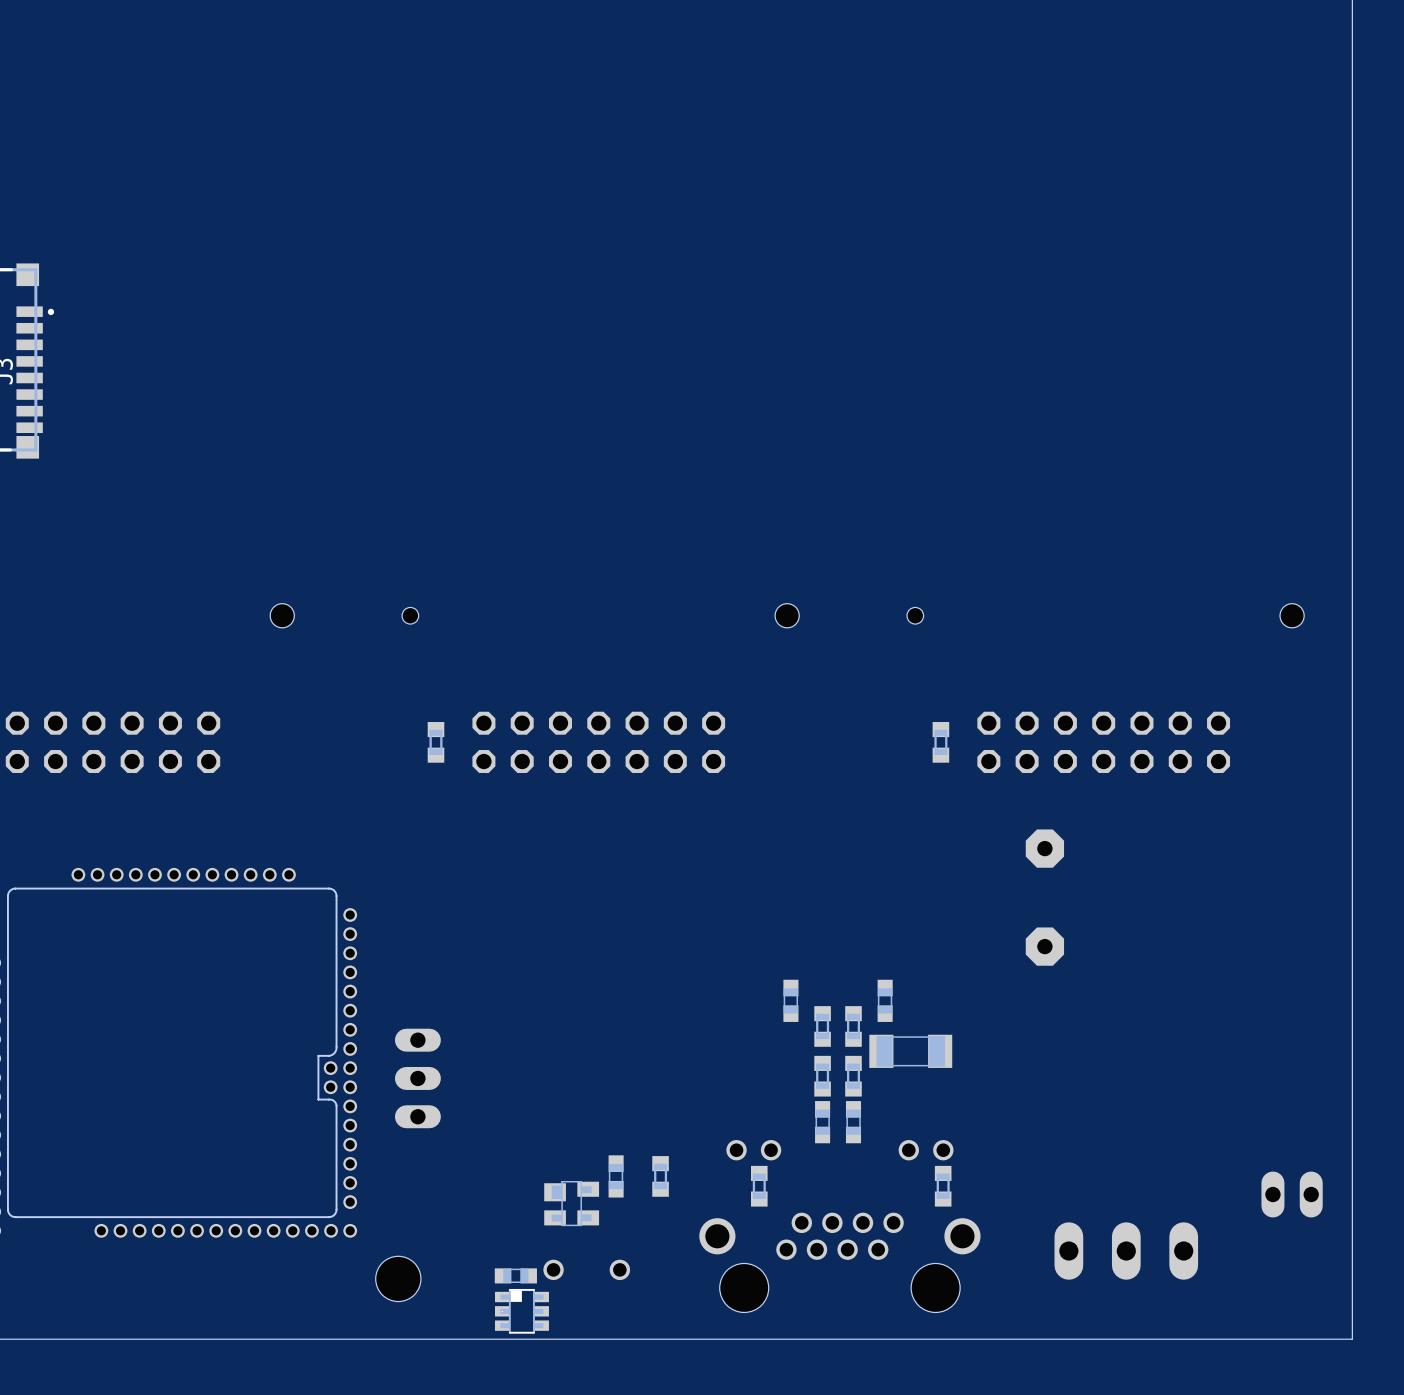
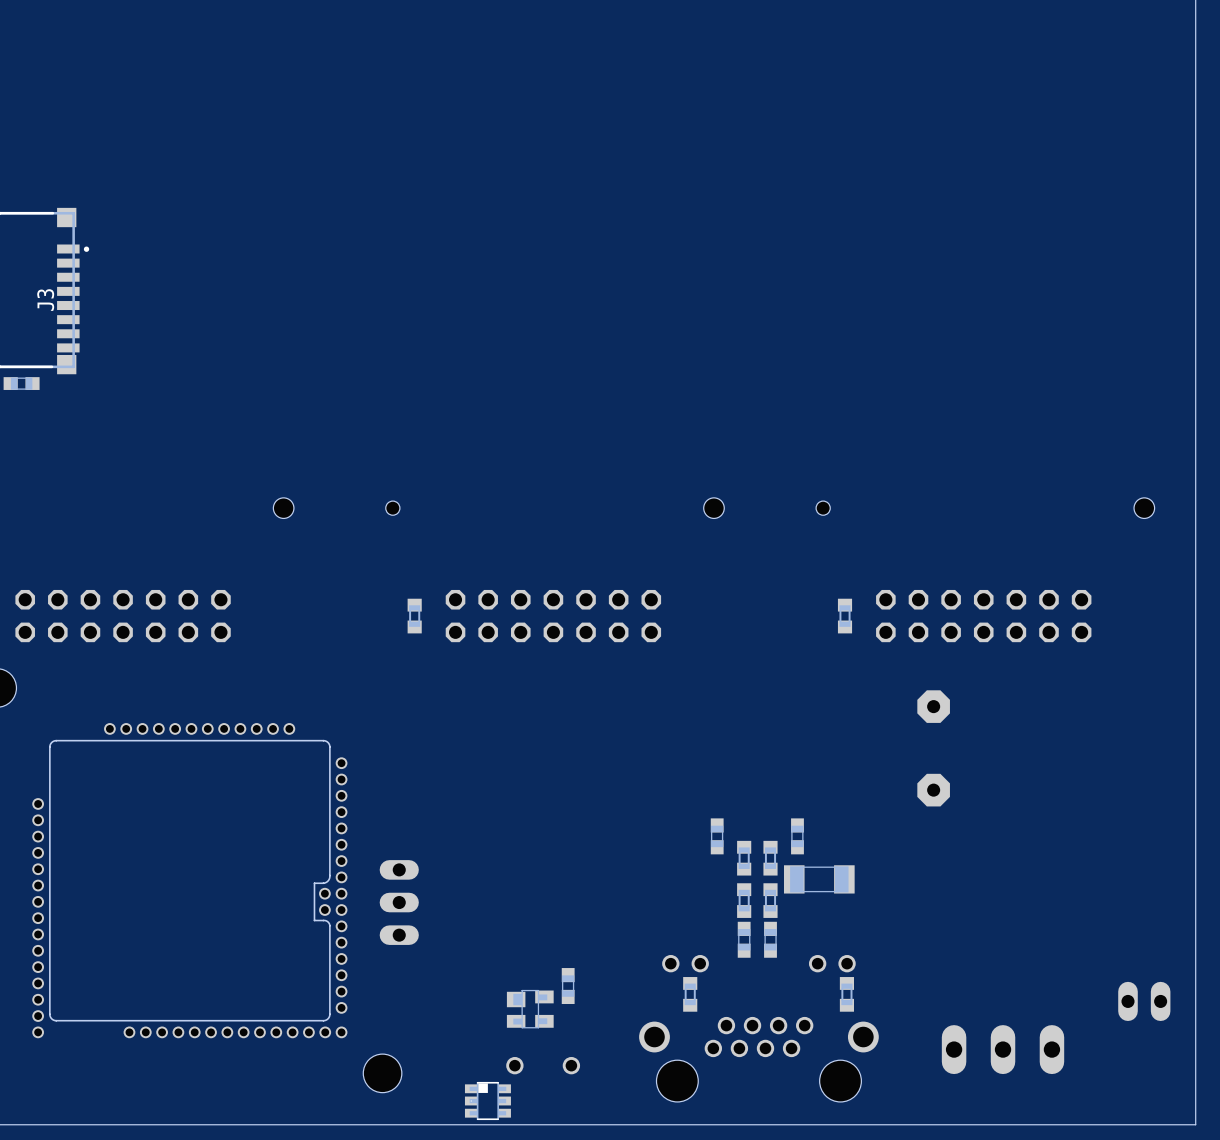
part: (660, 1176) -> none
part: (515, 1275) -> none

